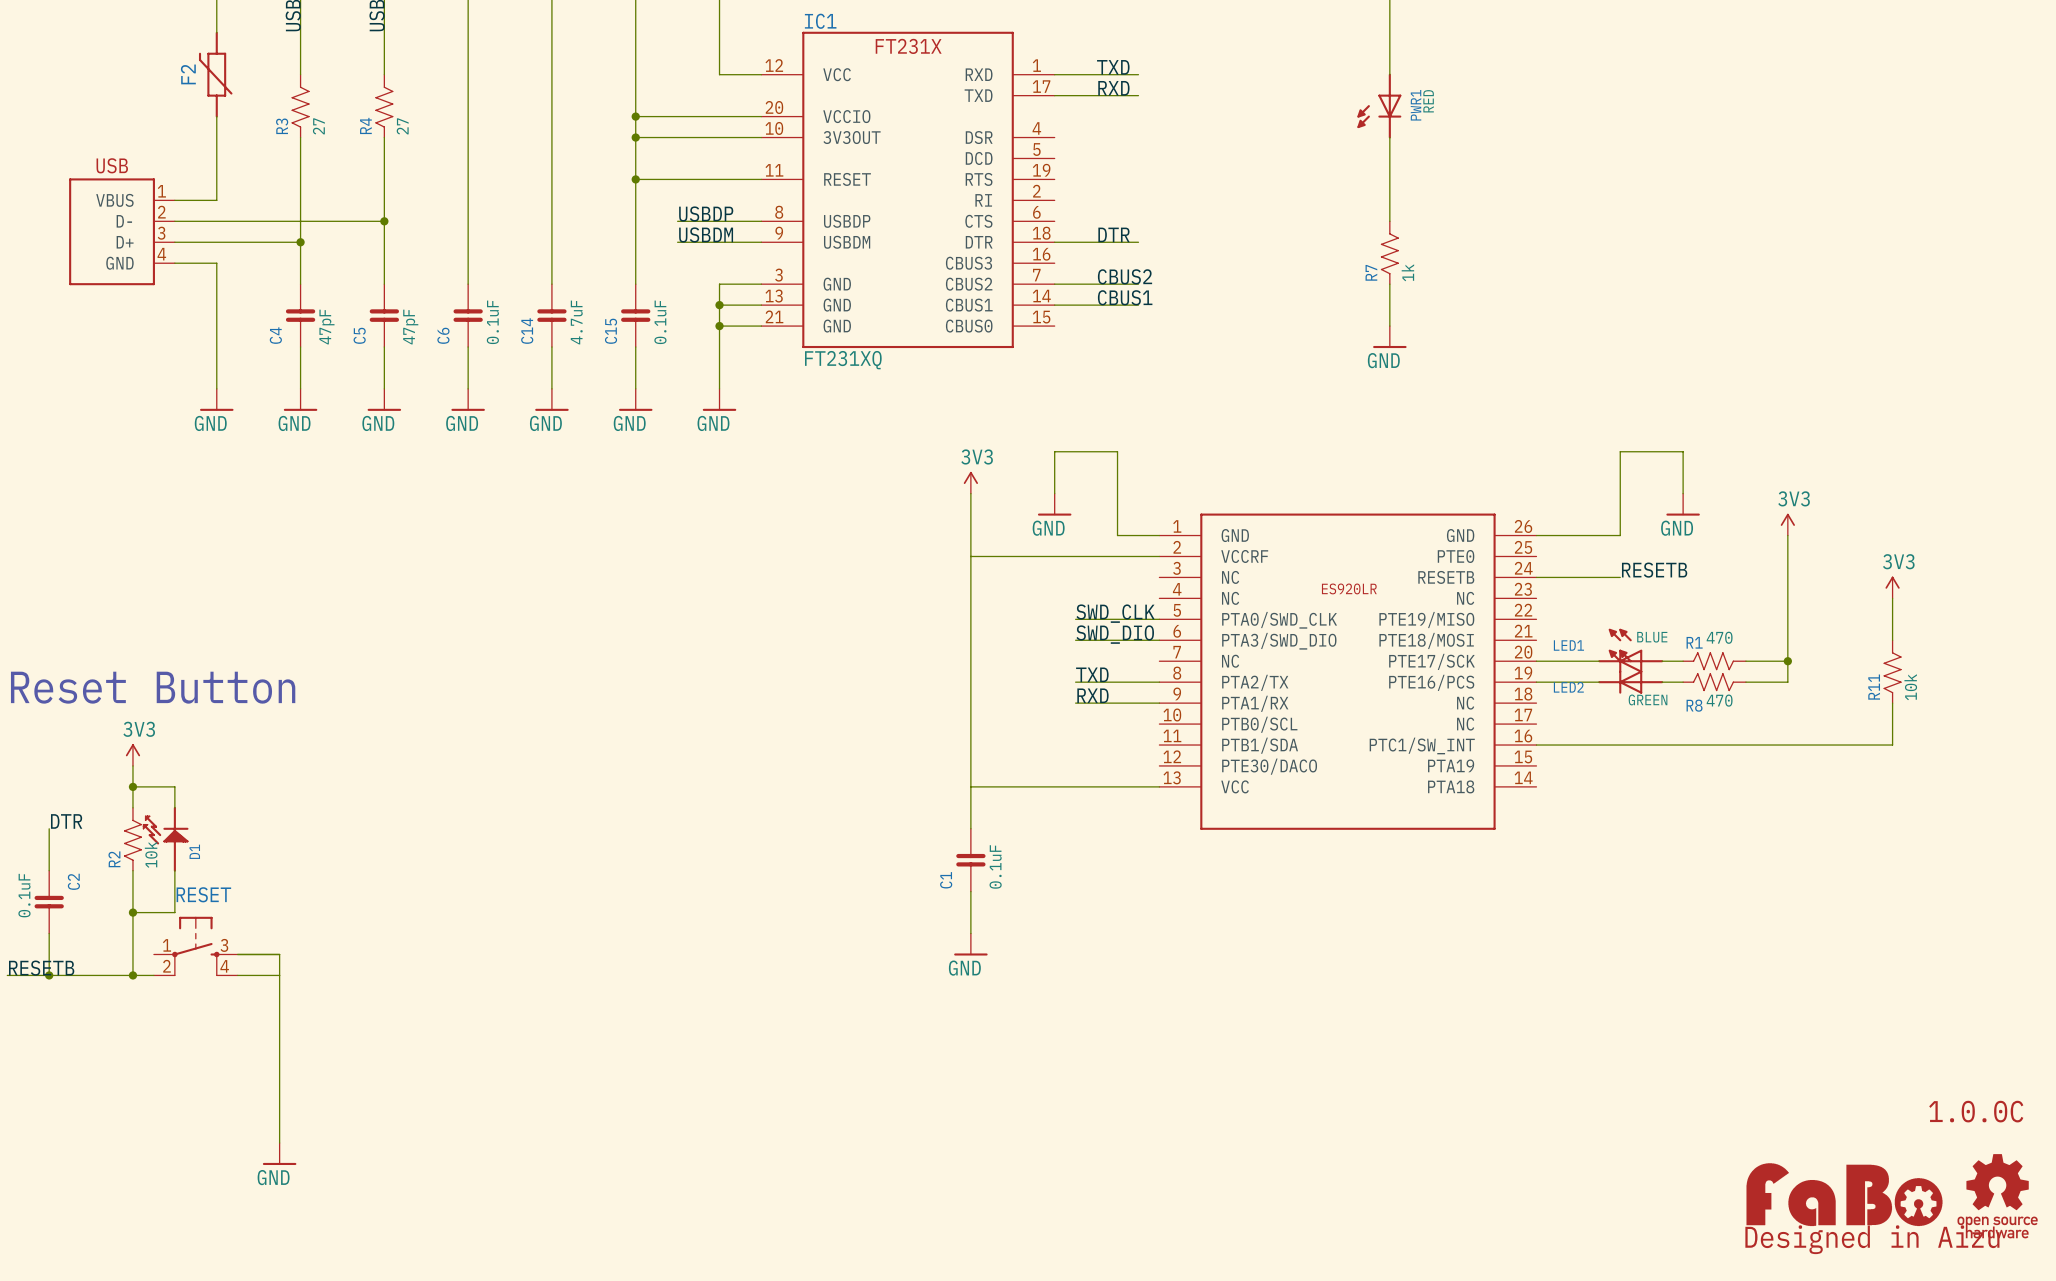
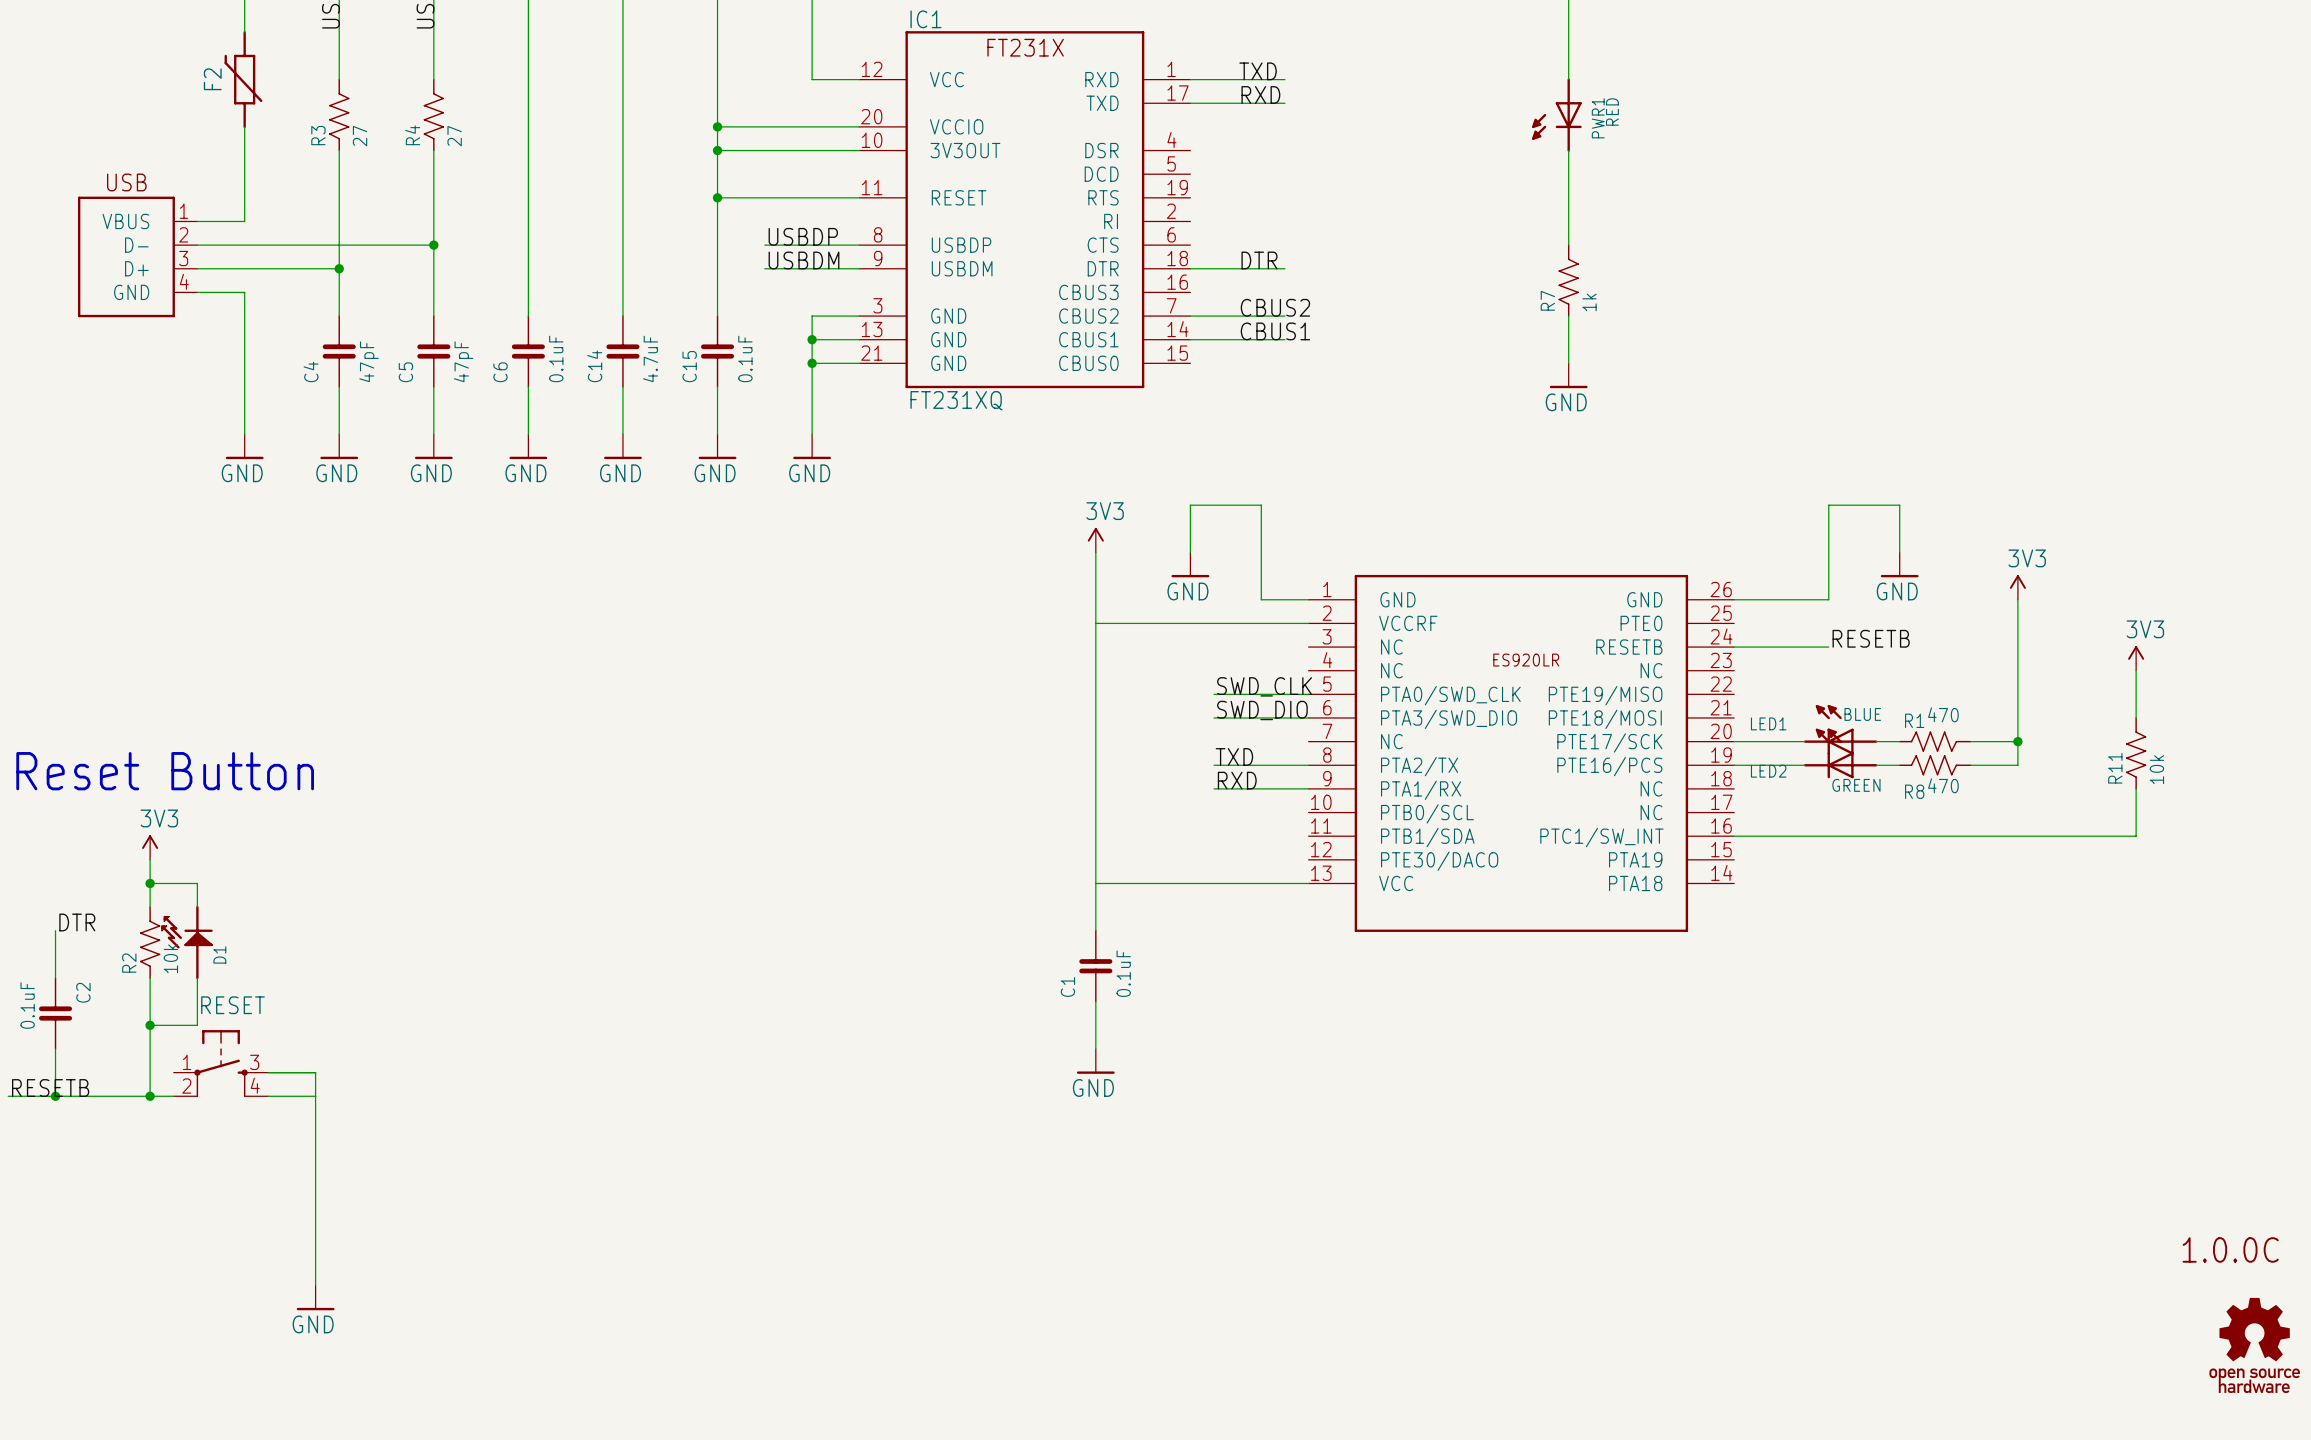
part: (1844, 1194) -> none

